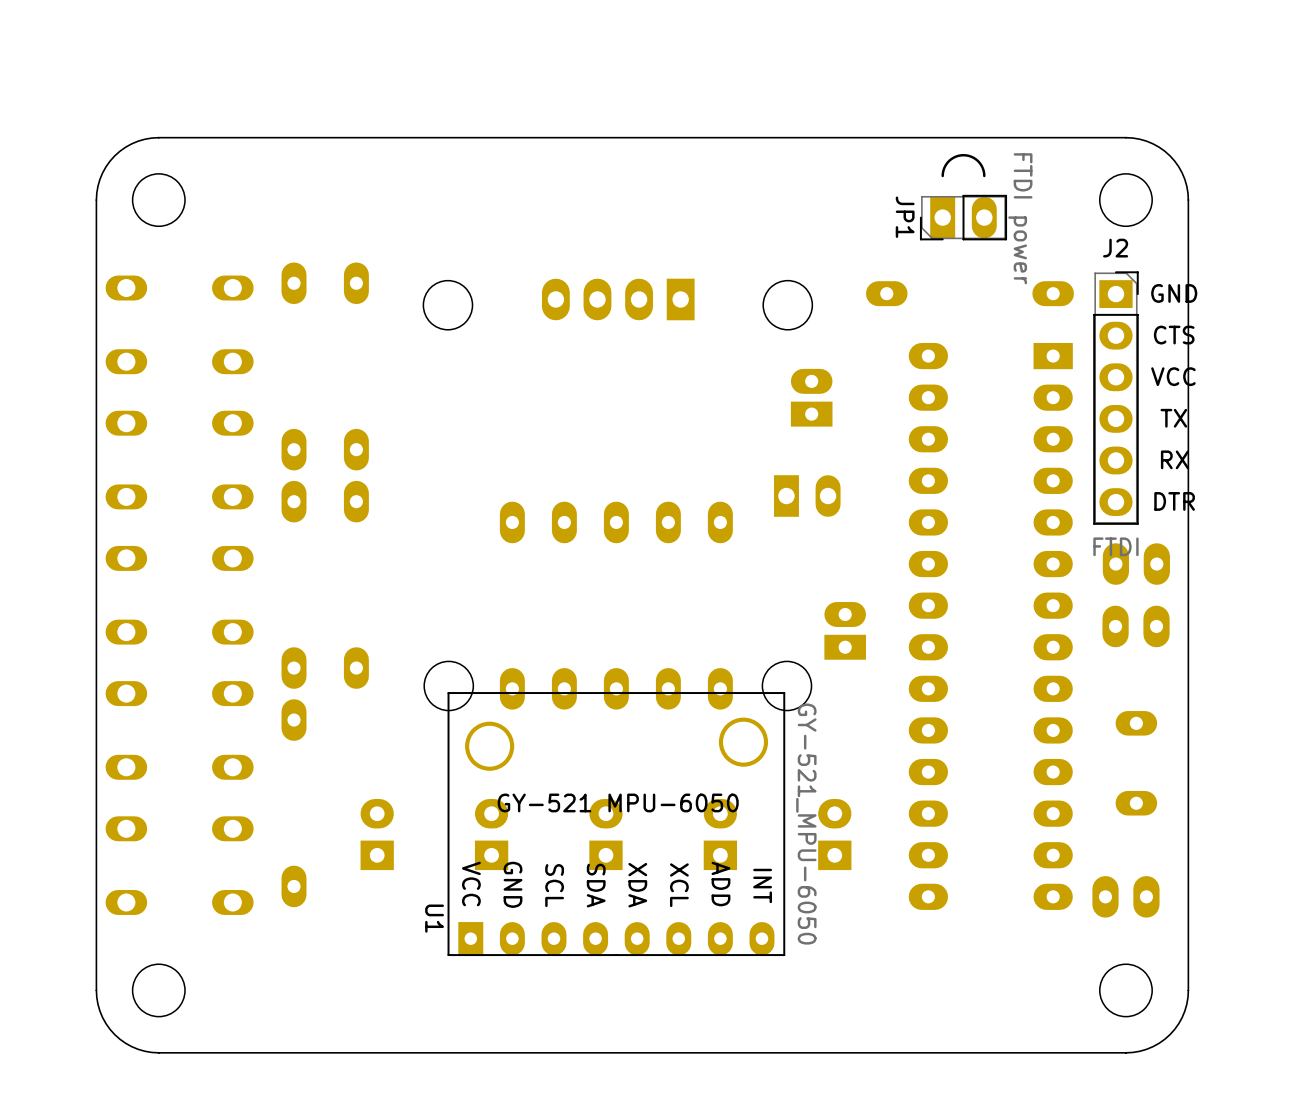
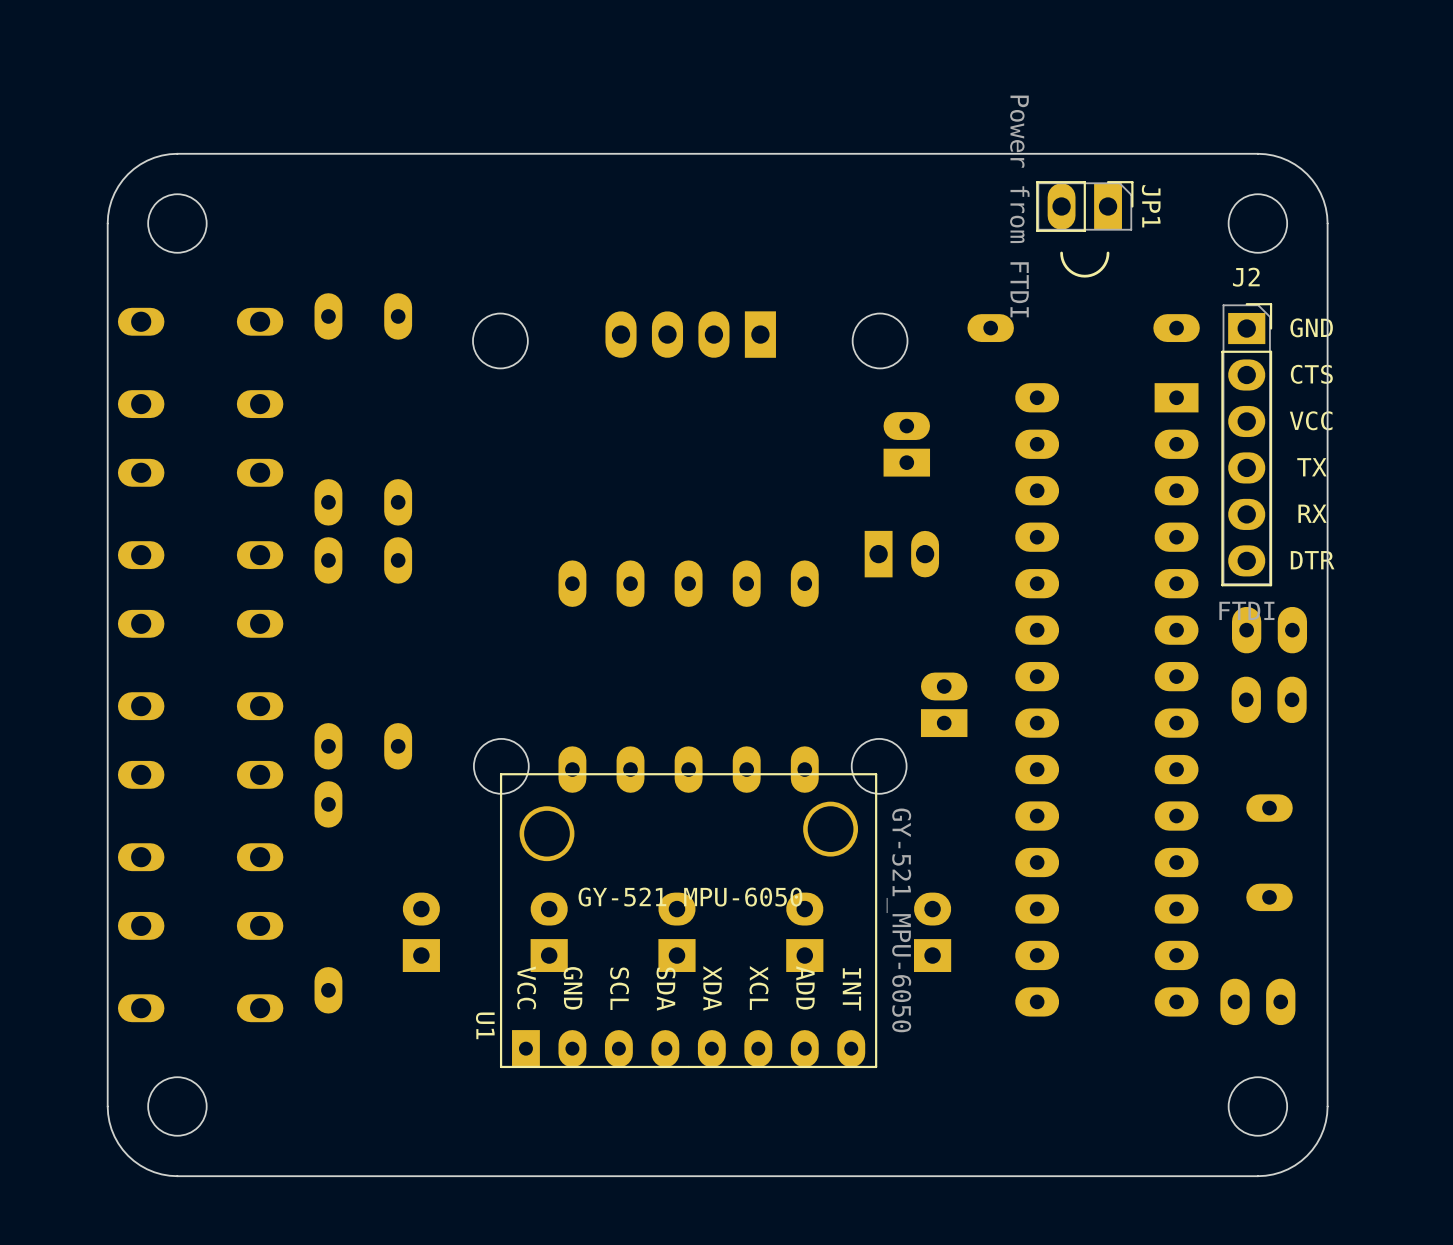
JP1 rotation: 0° (963, 197) -> 180° (1084, 229)
JP1 value: FTDI power (1020, 218) -> Power from FTDI (1019, 206)

